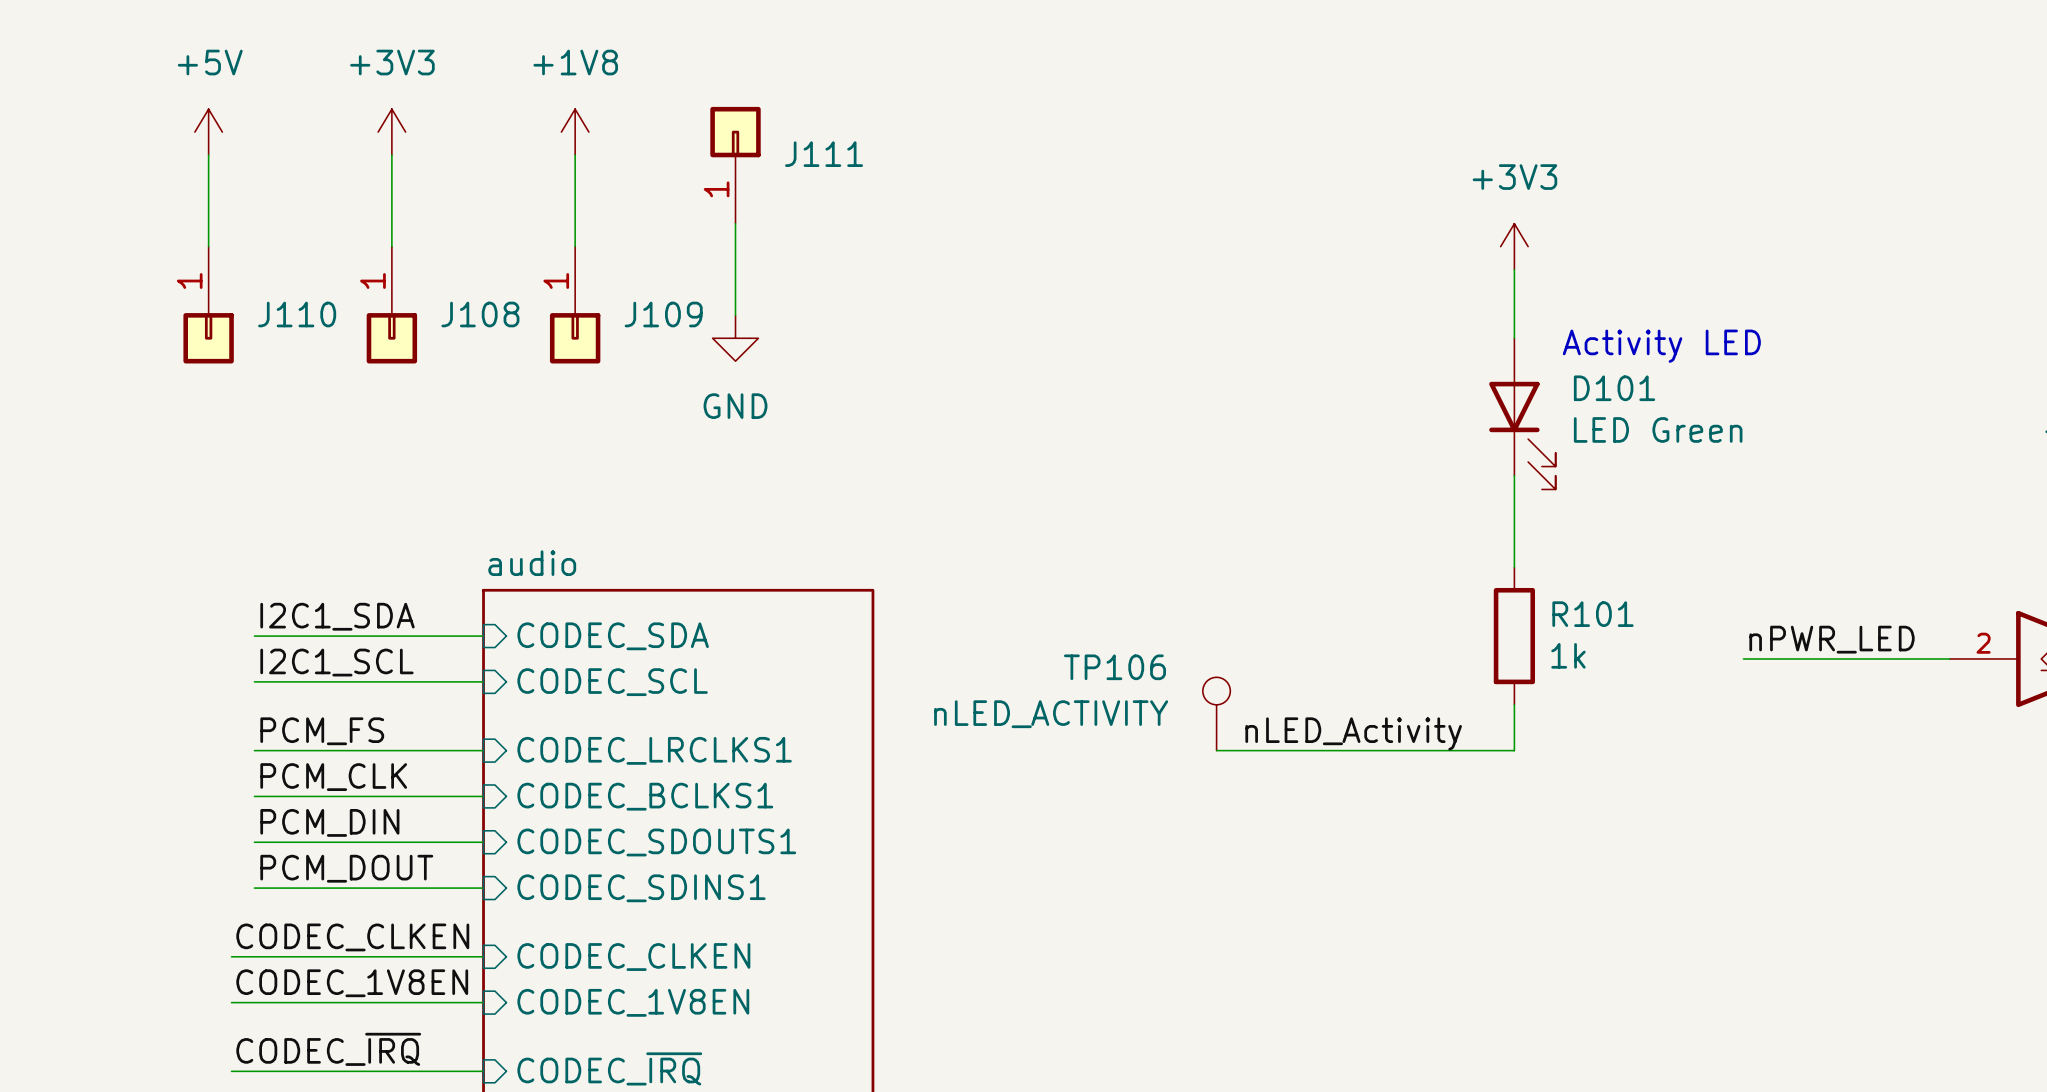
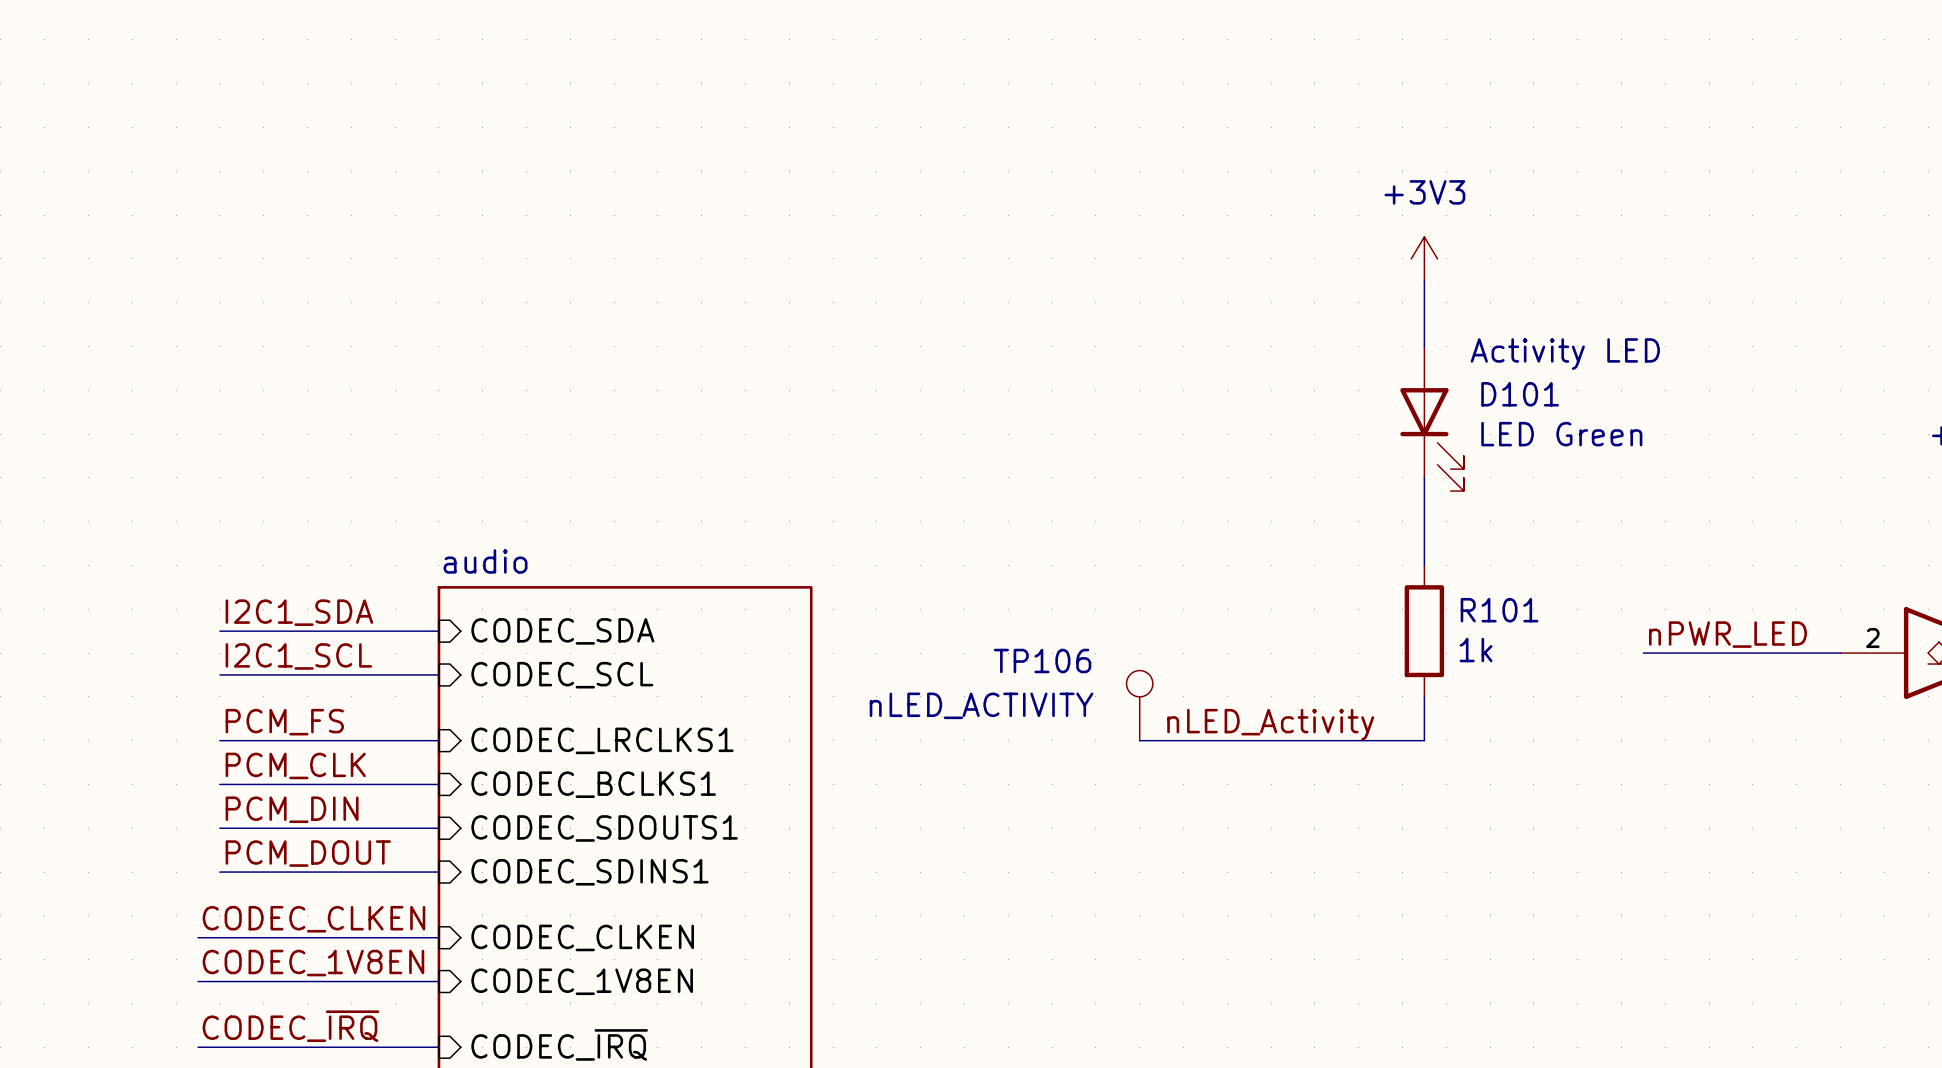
power symbol: +5V (208, 132) -> none
power symbol: +3V3 (391, 132) -> none
power symbol: +1V8 (575, 132) -> none
wire: (208, 155) (208, 246) -> none
wire: (391, 155) (391, 246) -> none
wire: (575, 155) (575, 246) -> none
J111: (735, 165) -> none
wire: (735, 223) (735, 315) -> none
J110: (208, 305) -> none
J108: (391, 305) -> none
J109: (575, 305) -> none
power symbol: GND (735, 338) -> none

